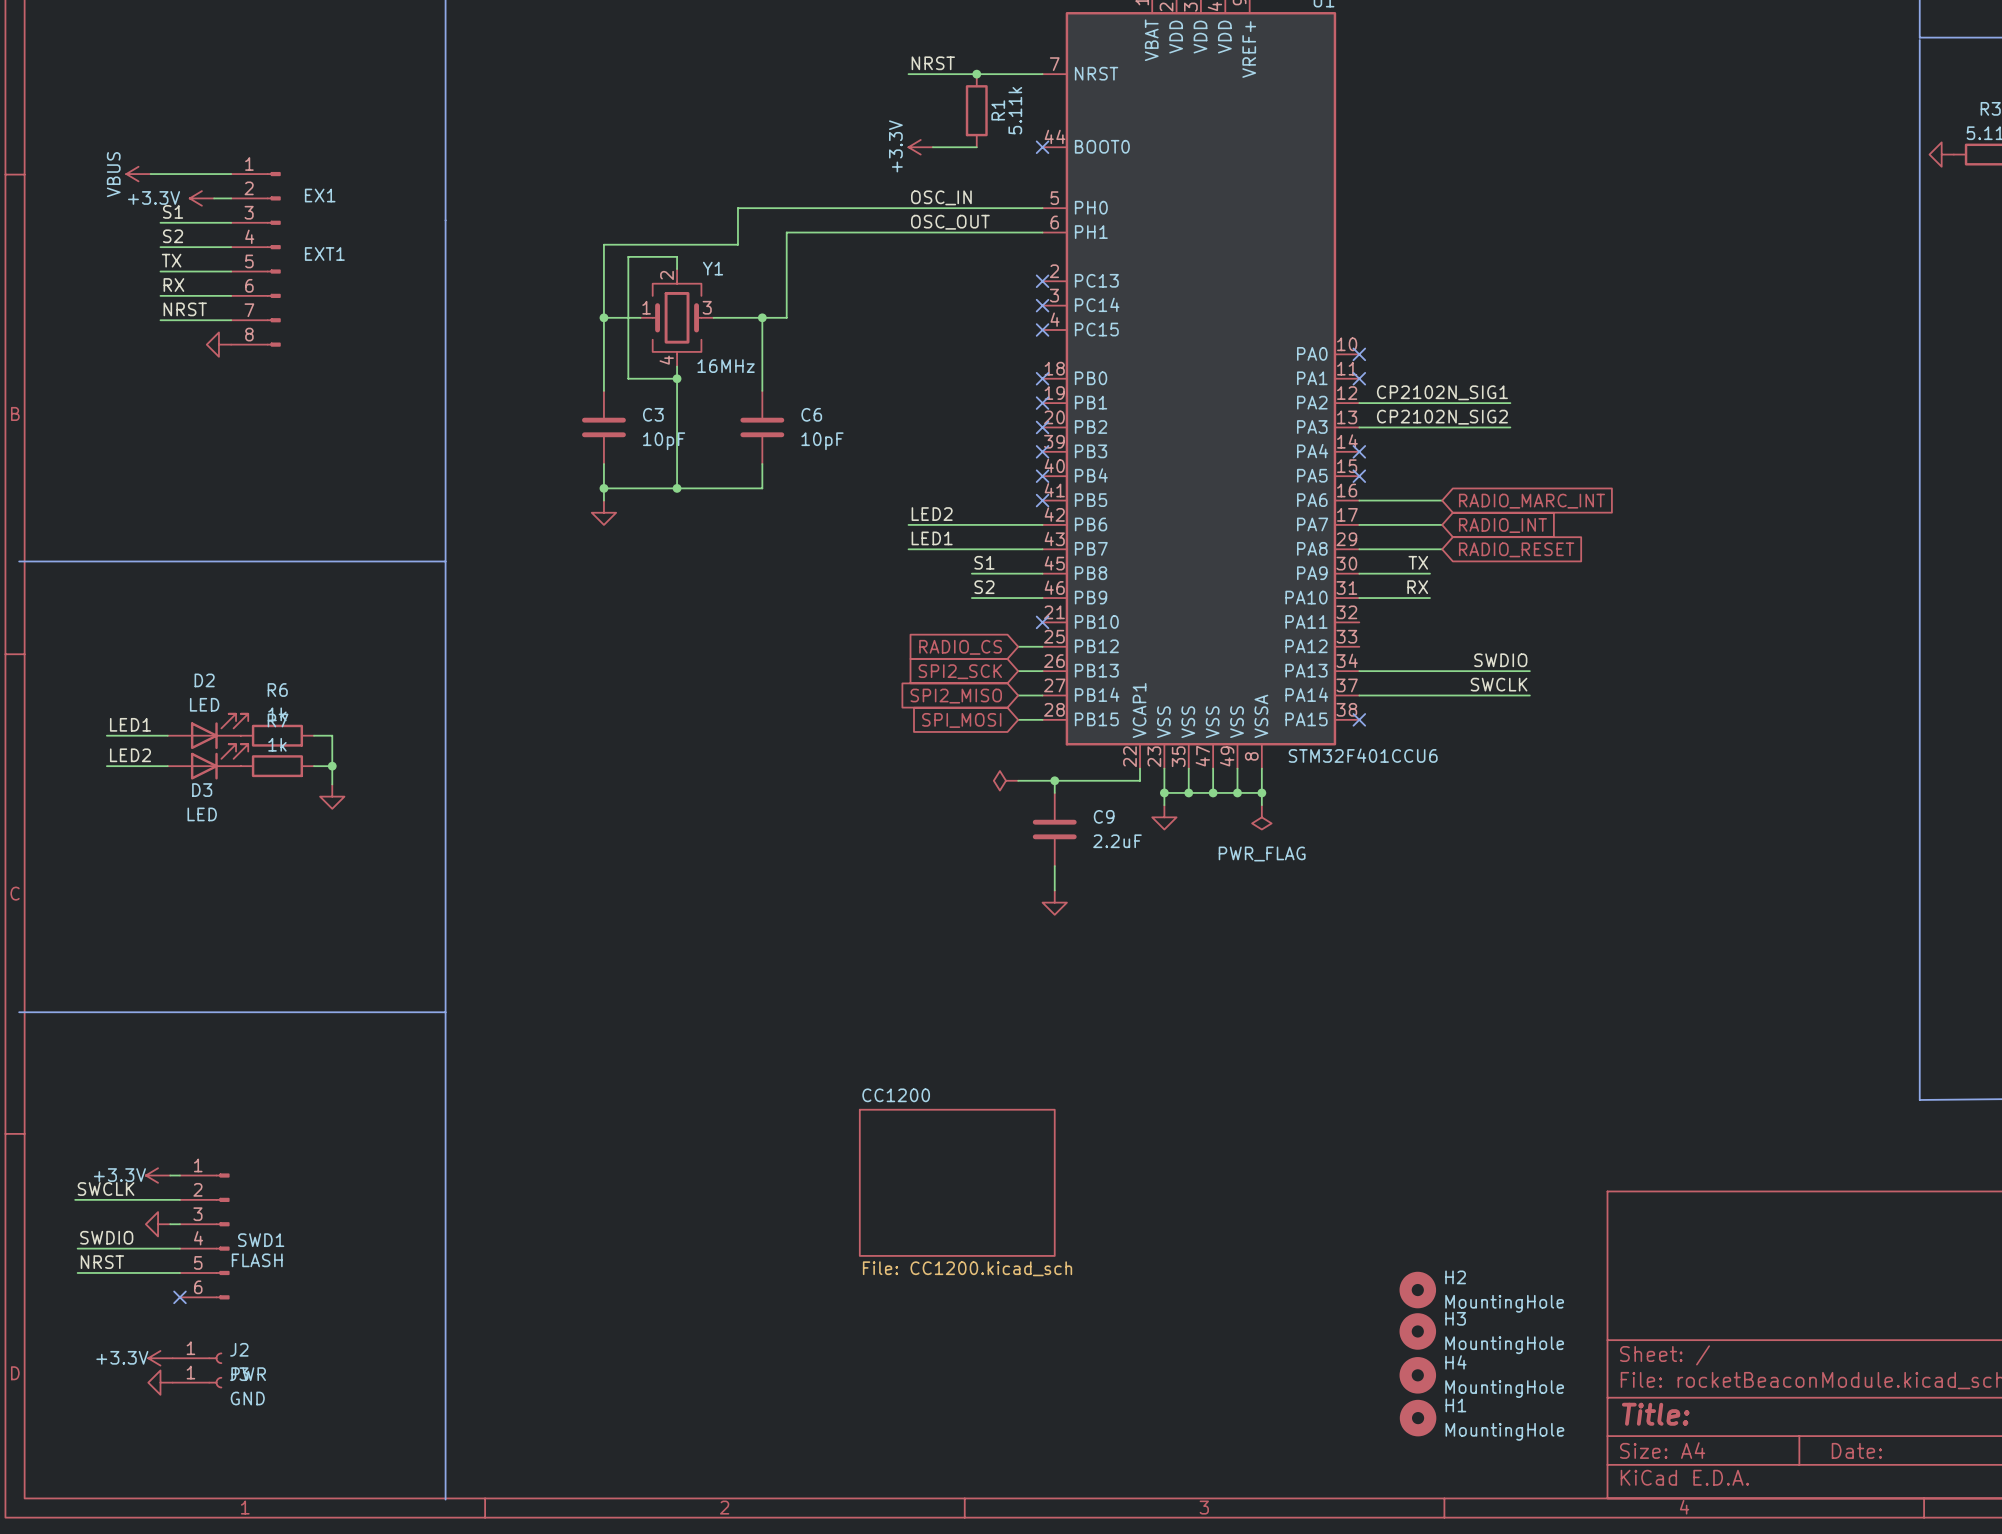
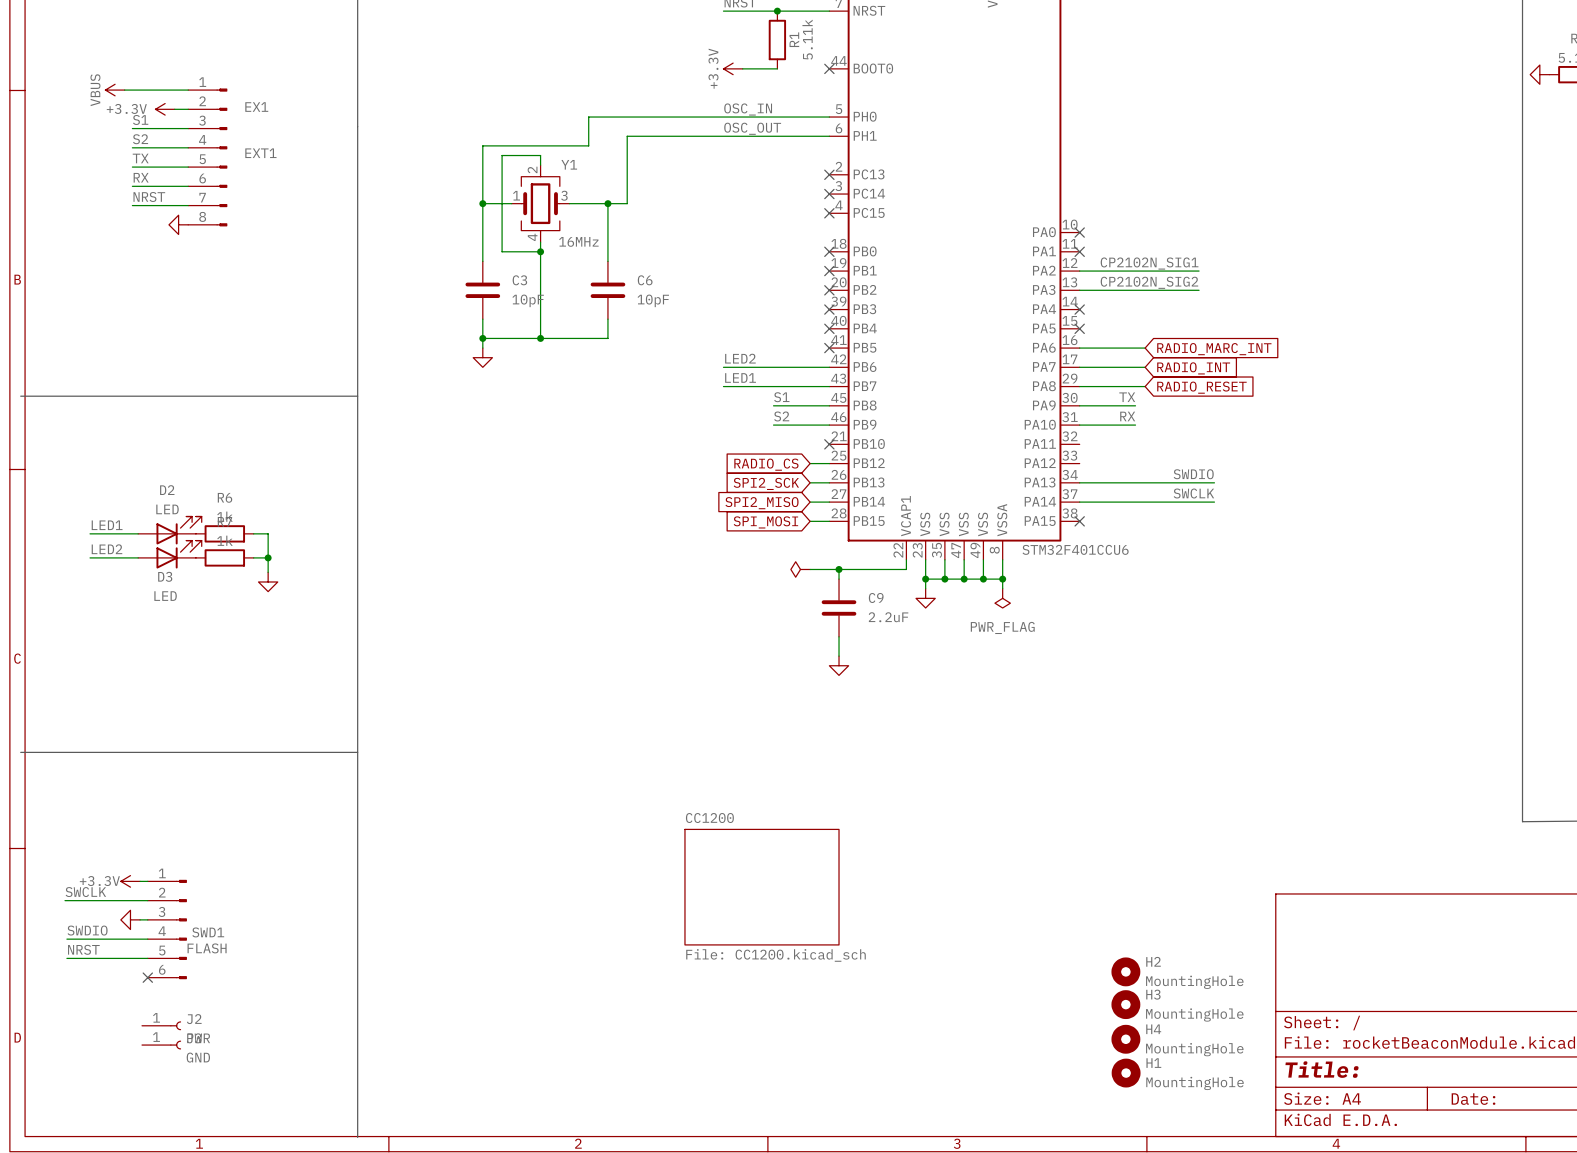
power symbol: +3.3V (160, 1358) -> none
power symbol: (160, 1382) -> none

